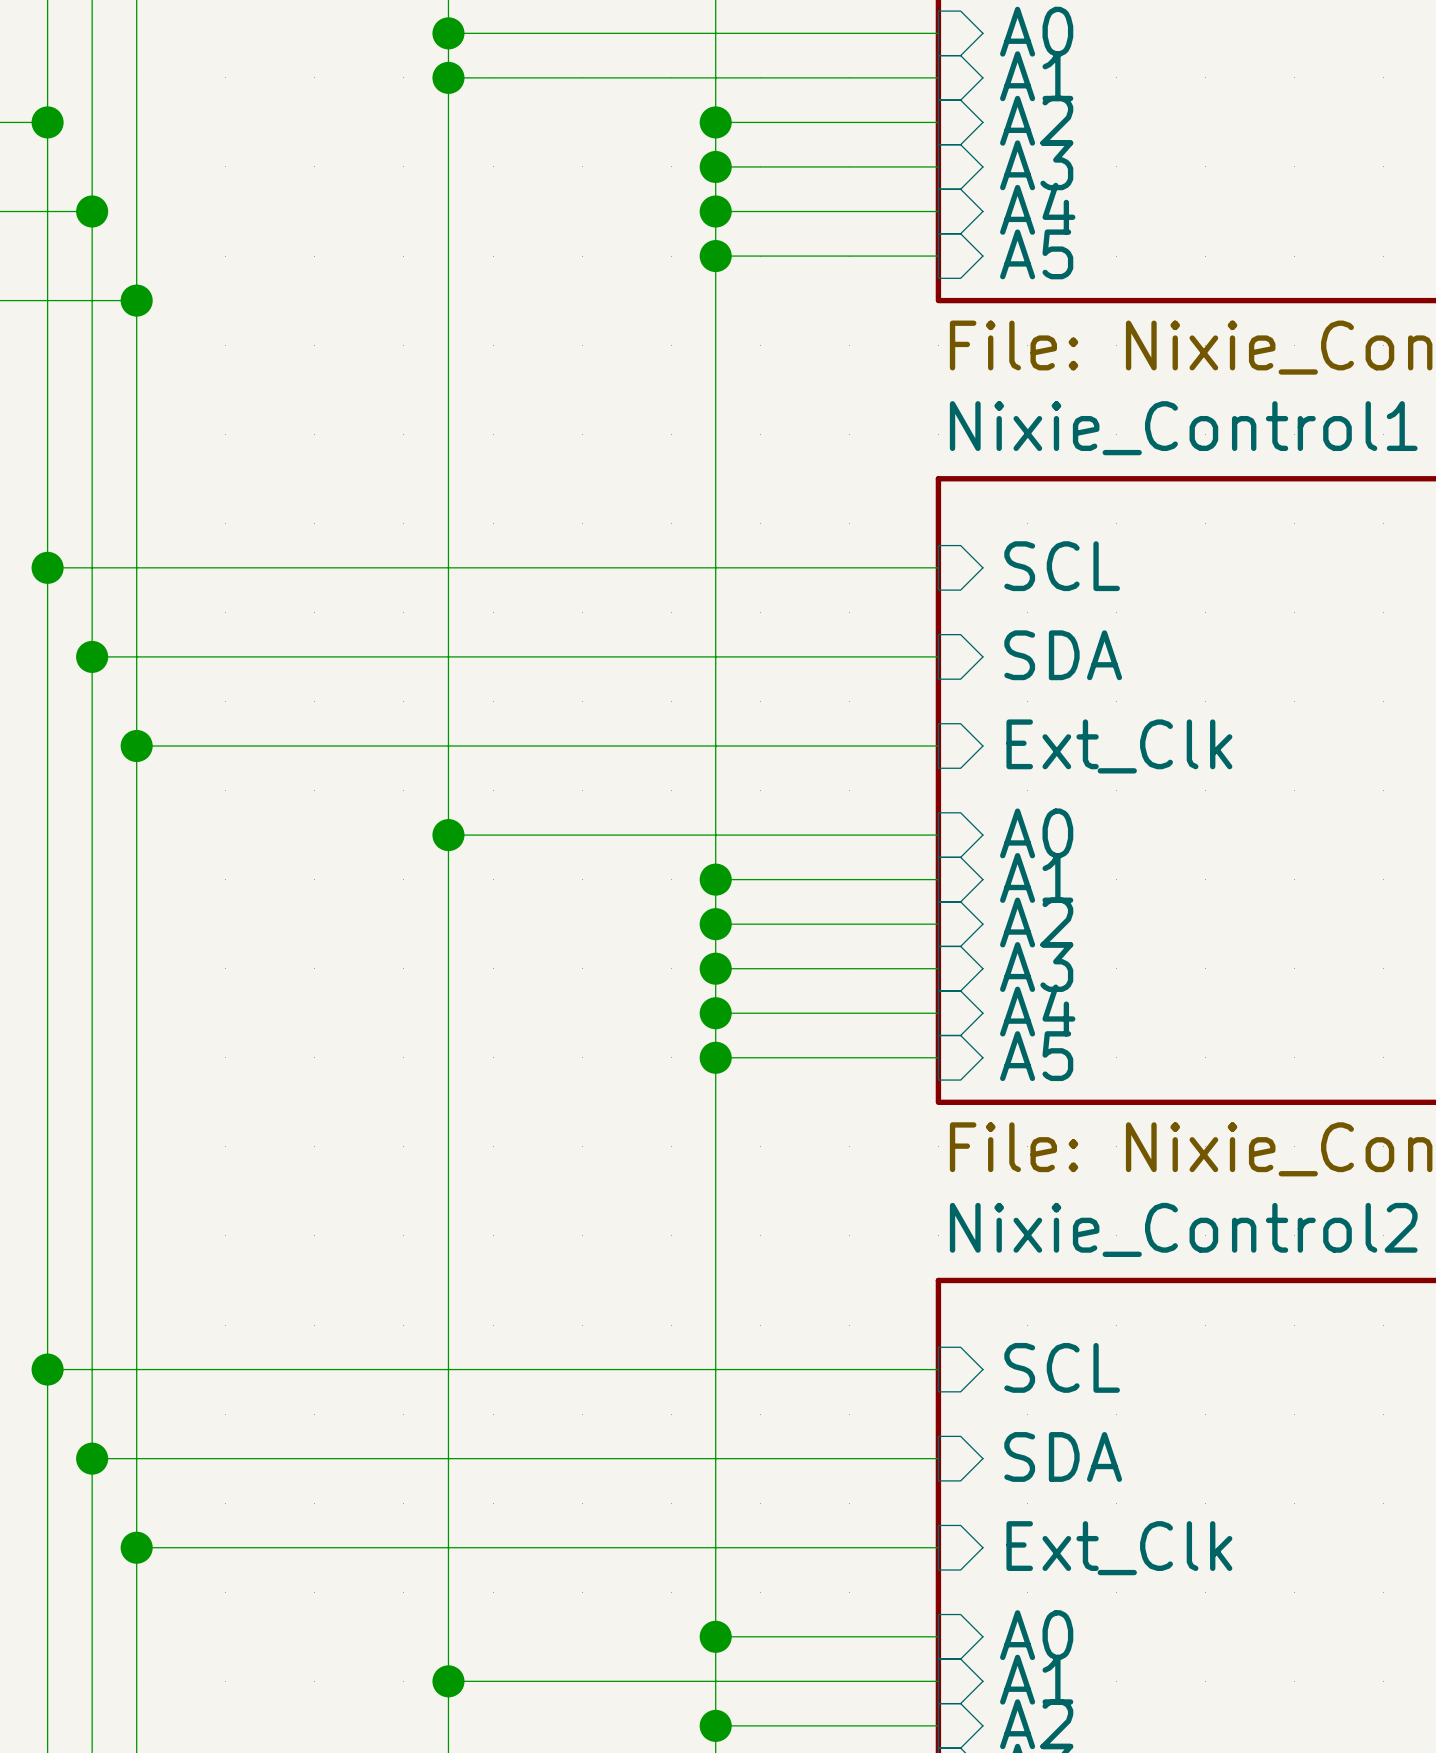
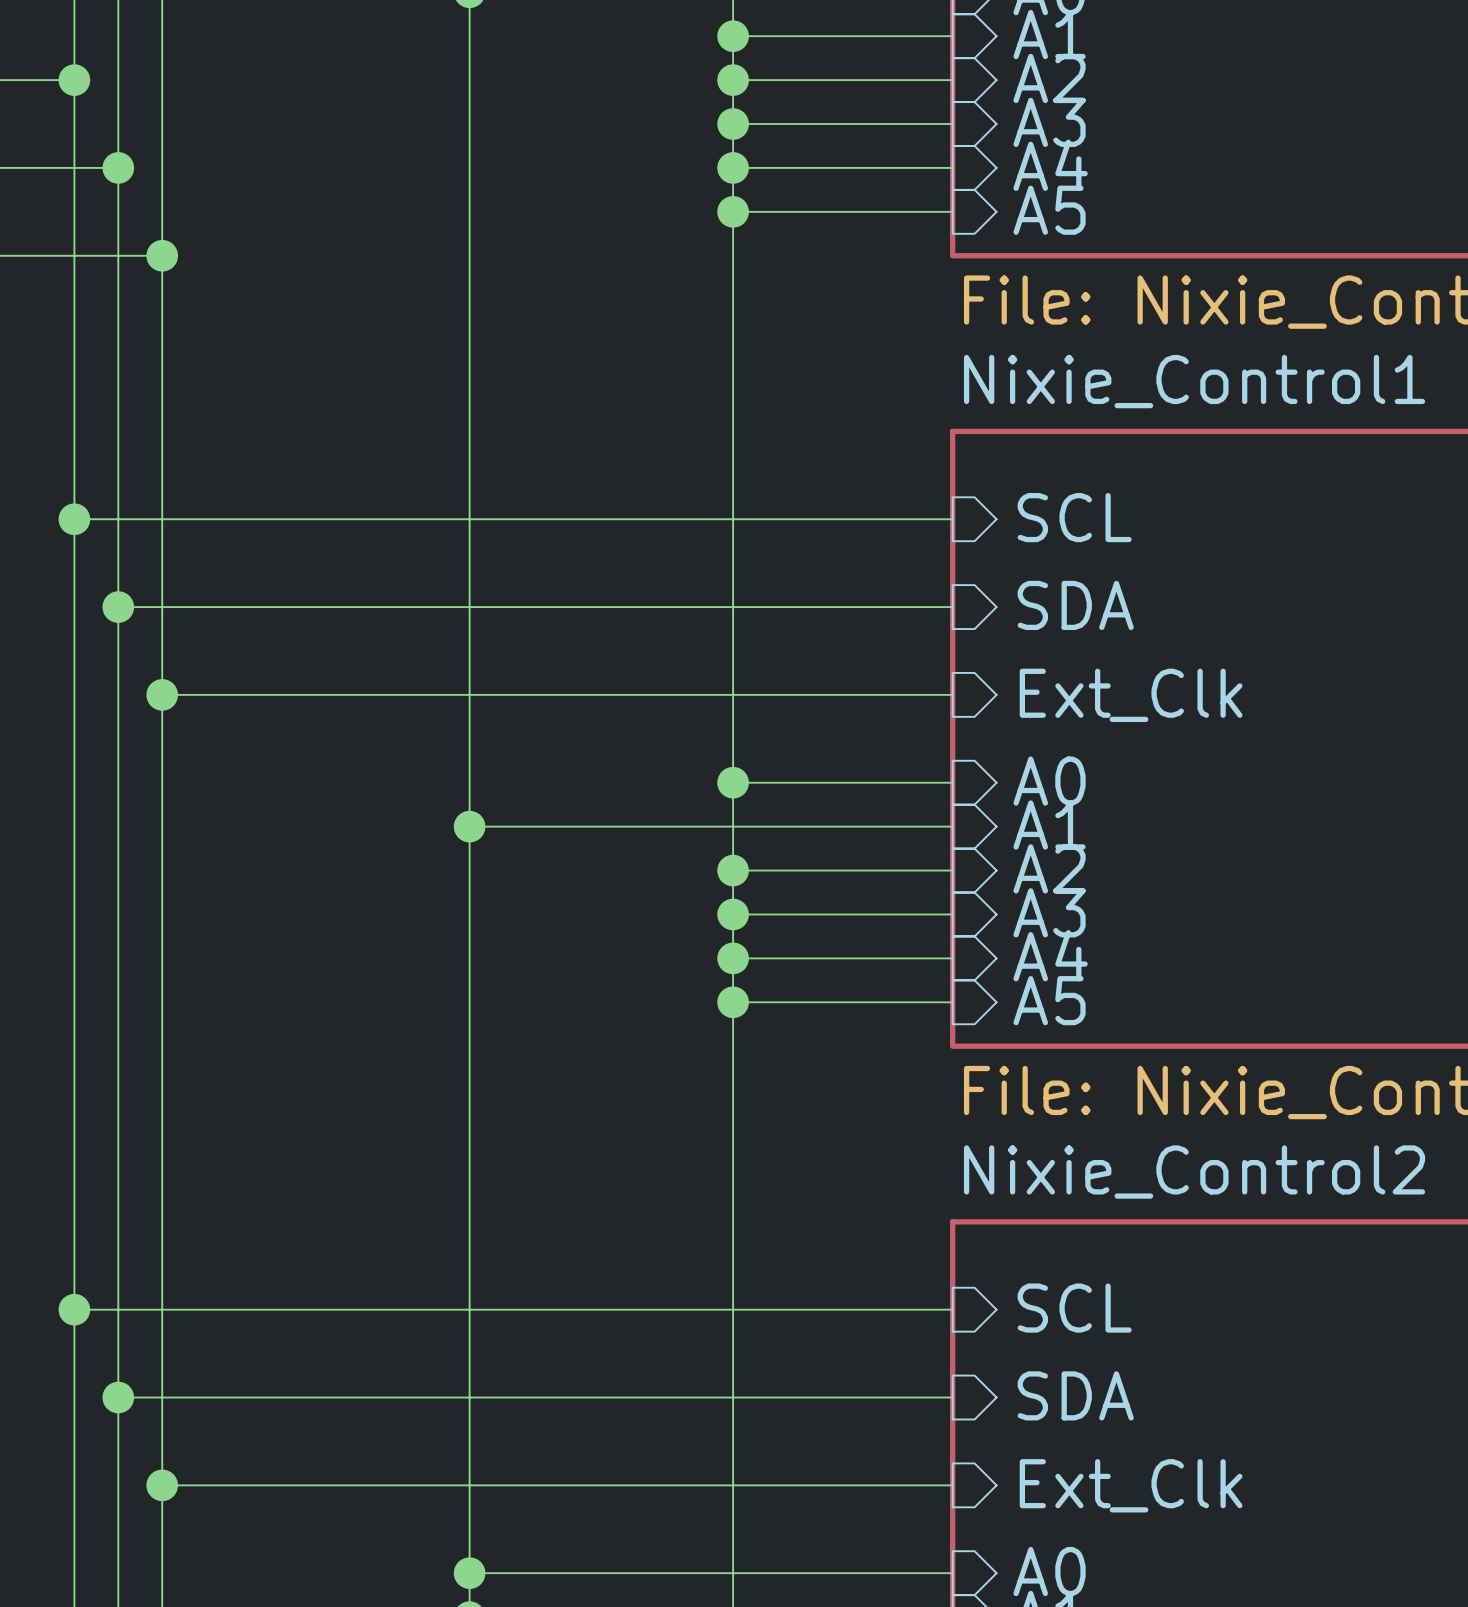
wire: (448, 77) (715, 77) -> (469, 826) (733, 826)
junction: (448, 77) -> none
junction: none -> (733, 36)
wire: (448, 835) (715, 835) -> (469, 1573) (733, 1573)
junction position: (448, 835) -> (469, 826)
junction position: (715, 879) -> (733, 782)
junction: none -> (469, 1573)
junction: (715, 1636) -> none

